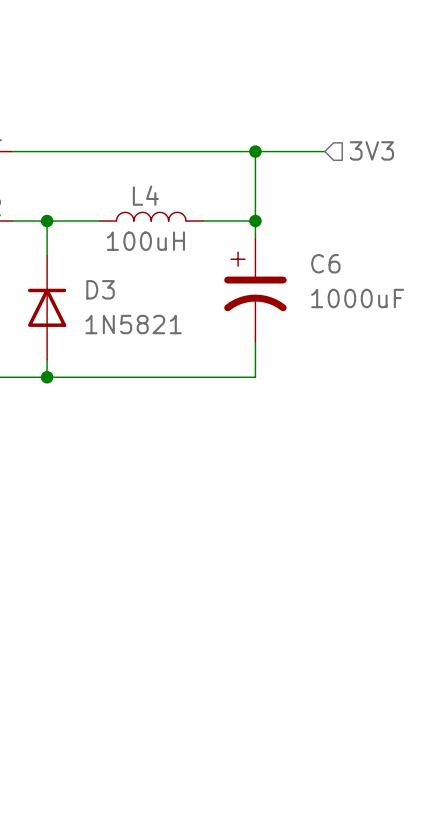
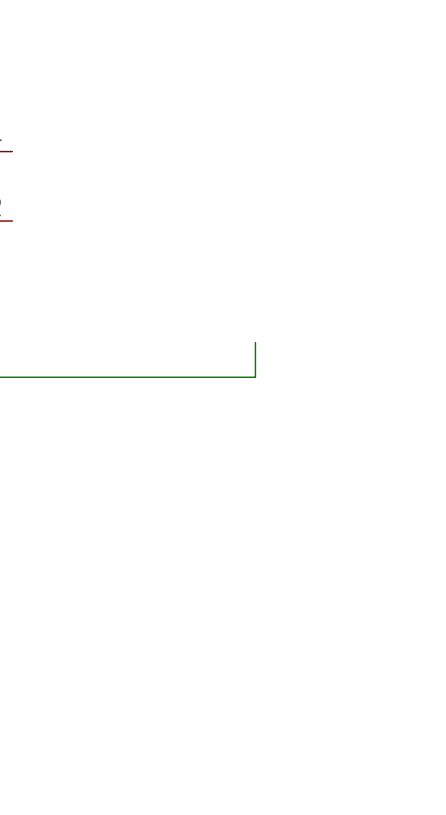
hierarchical label: 3V3 (371, 150) -> none
wire: (12, 151) (324, 151) -> none
wire: (255, 151) (255, 238) -> none
junction: (255, 151) -> none
L4: 100uH (151, 216) -> none
wire: (12, 221) (99, 221) -> none
wire: (47, 221) (47, 255) -> none
junction: (47, 221) -> none
wire: (203, 221) (255, 221) -> none
junction: (255, 221) -> none
C6: 1000uF (255, 290) -> none
D3: 1N5821 (47, 307) -> none
wire: (47, 359) (47, 377) -> none
junction: (47, 377) -> none

